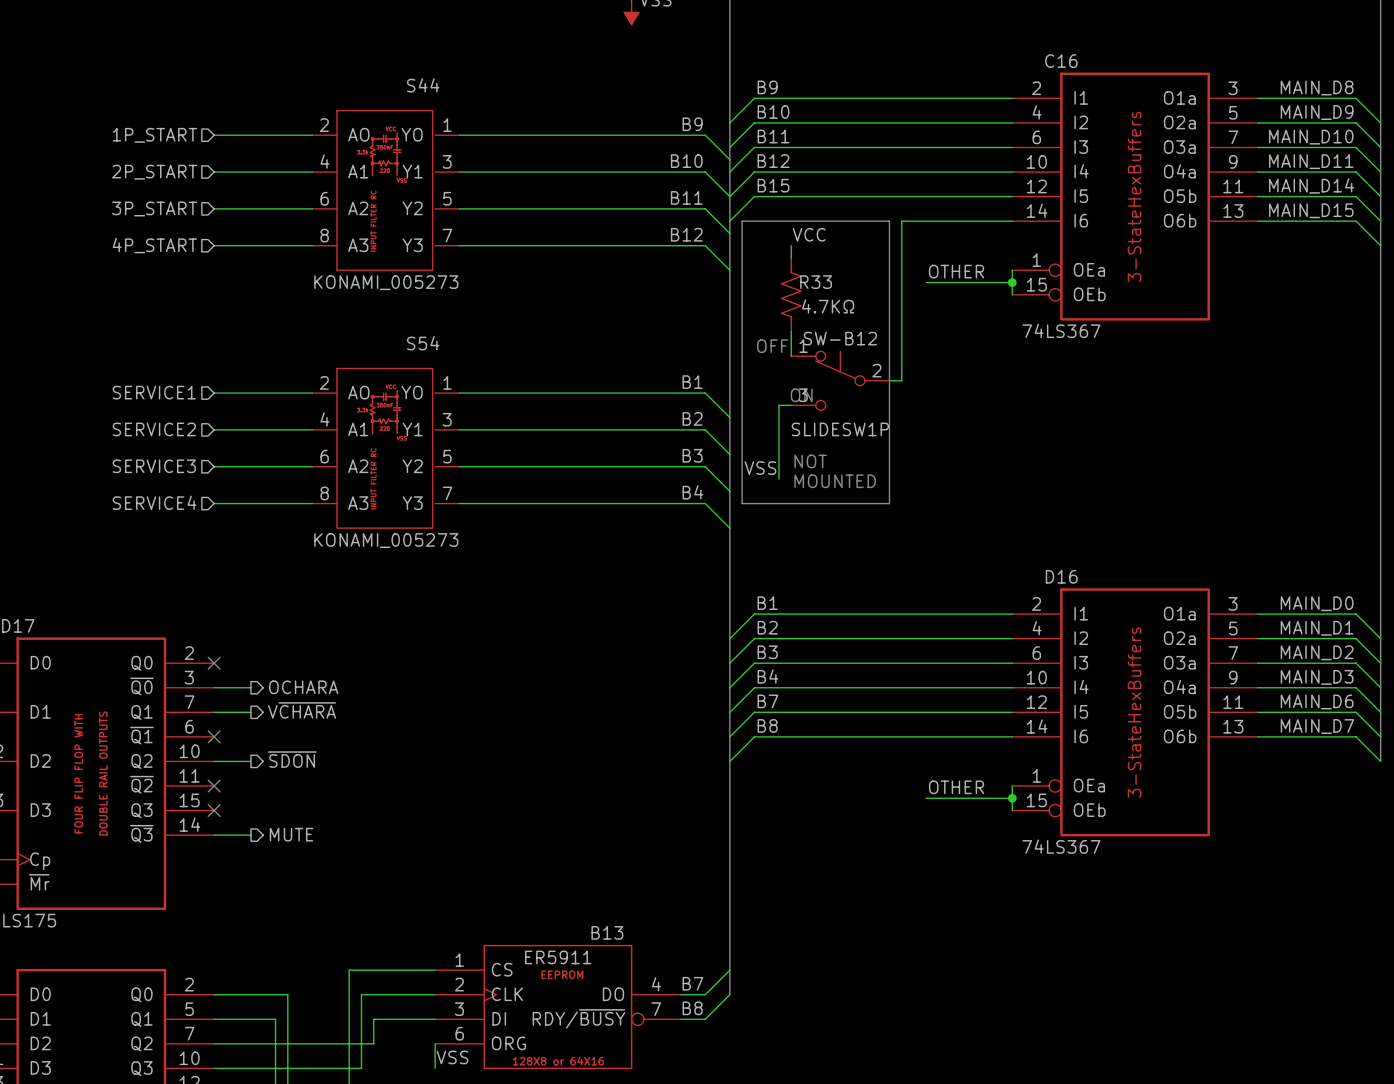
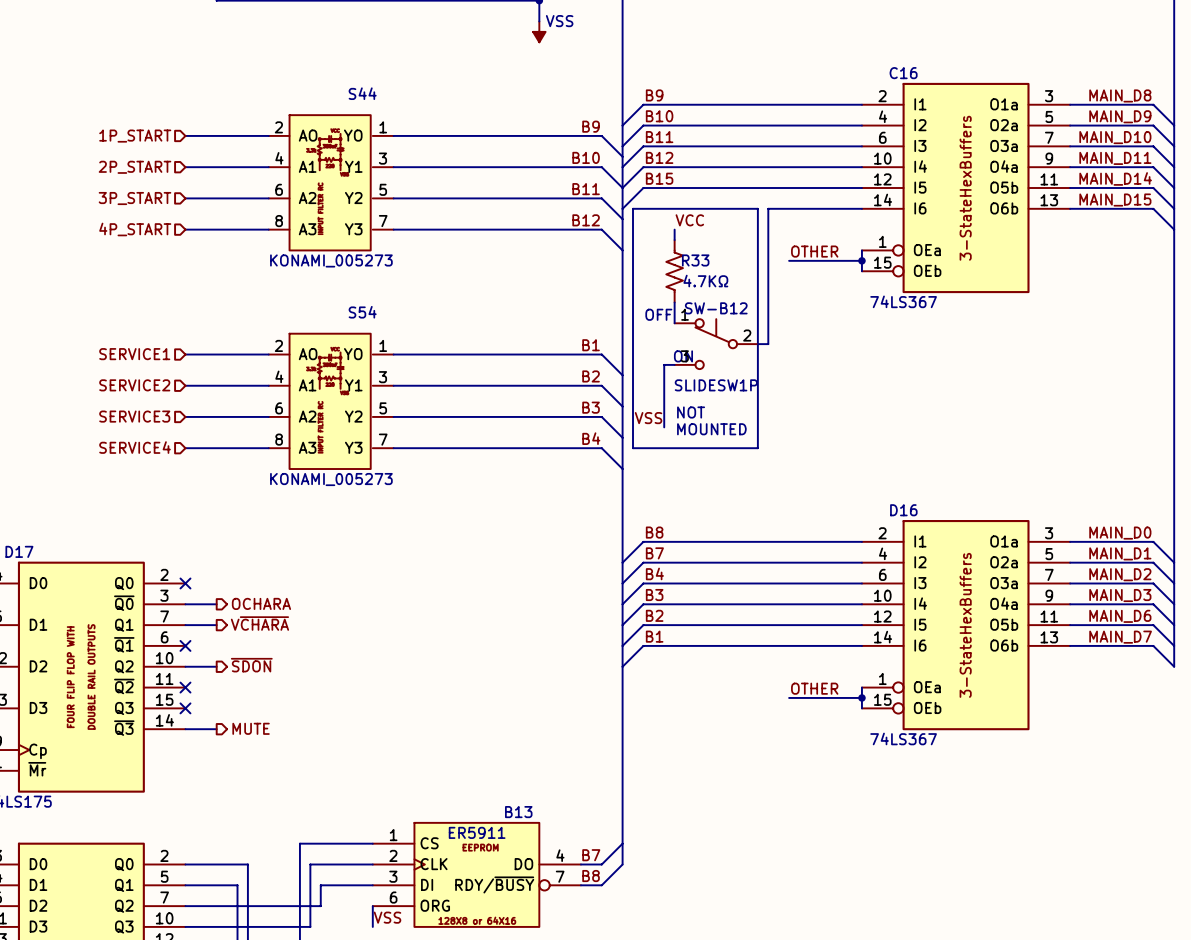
label: B1 (767, 603) -> B8 (654, 532)
label: B2 (767, 627) -> B7 (654, 553)
label: B3 (767, 652) -> B4 (654, 573)
label: B4 (767, 676) -> B3 (654, 595)
label: B7 (767, 701) -> B2 (654, 615)
label: B8 (767, 725) -> B1 (654, 636)

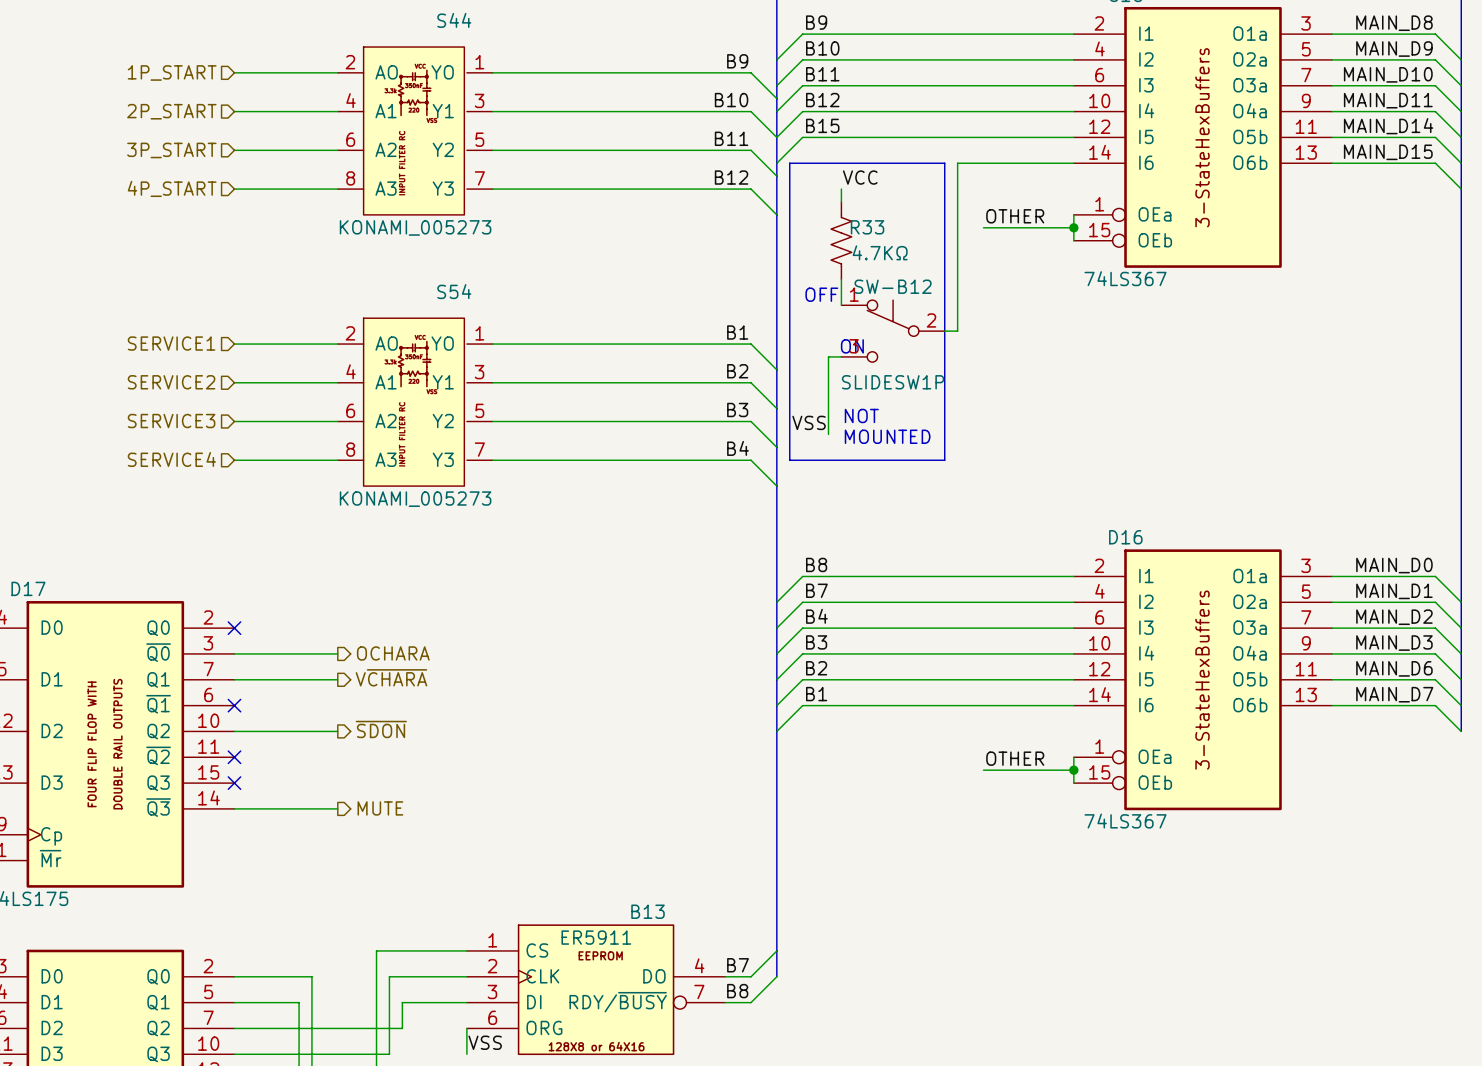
hierarchical label position: OCHARA (261, 603) -> OCHARA (393, 653)
wire: none -> (273, 653) (337, 653)
hierarchical label position: V~{CHARA} (259, 623) -> V~{CHARA} (391, 677)
wire: none -> (273, 679) (337, 679)
hierarchical label position: ~{SDON} (251, 665) -> ~{SDON} (381, 729)
wire: none -> (273, 731) (337, 731)
hierarchical label position: MUTE (251, 728) -> MUTE (380, 808)
wire: none -> (273, 808) (337, 808)

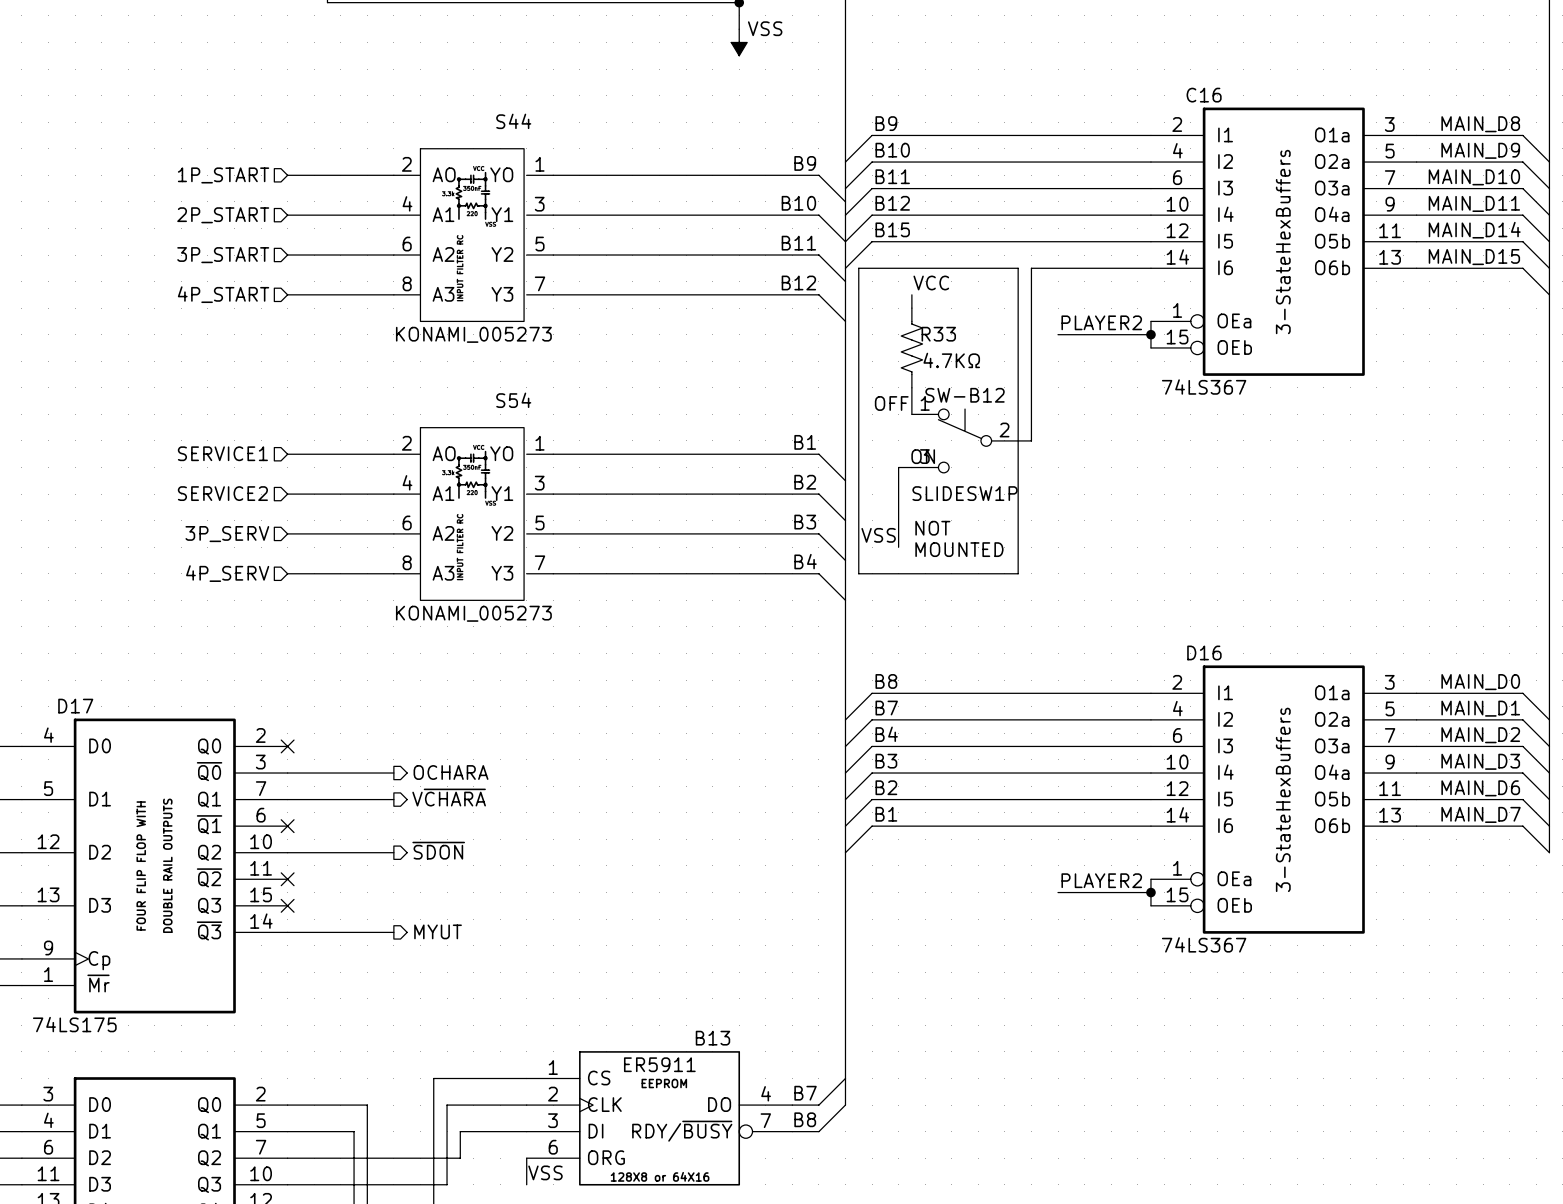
label: OTHER (1015, 216) -> PLAYER2 (1101, 322)
hierarchical label: SERVICE3 (171, 421) -> 3P_SERV (227, 534)
hierarchical label: SERVICE4 (171, 459) -> 4P_SERV (227, 573)
label: OTHER (1015, 758) -> PLAYER2 (1101, 880)
hierarchical label: MUTE (380, 808) -> MYUT (438, 931)

